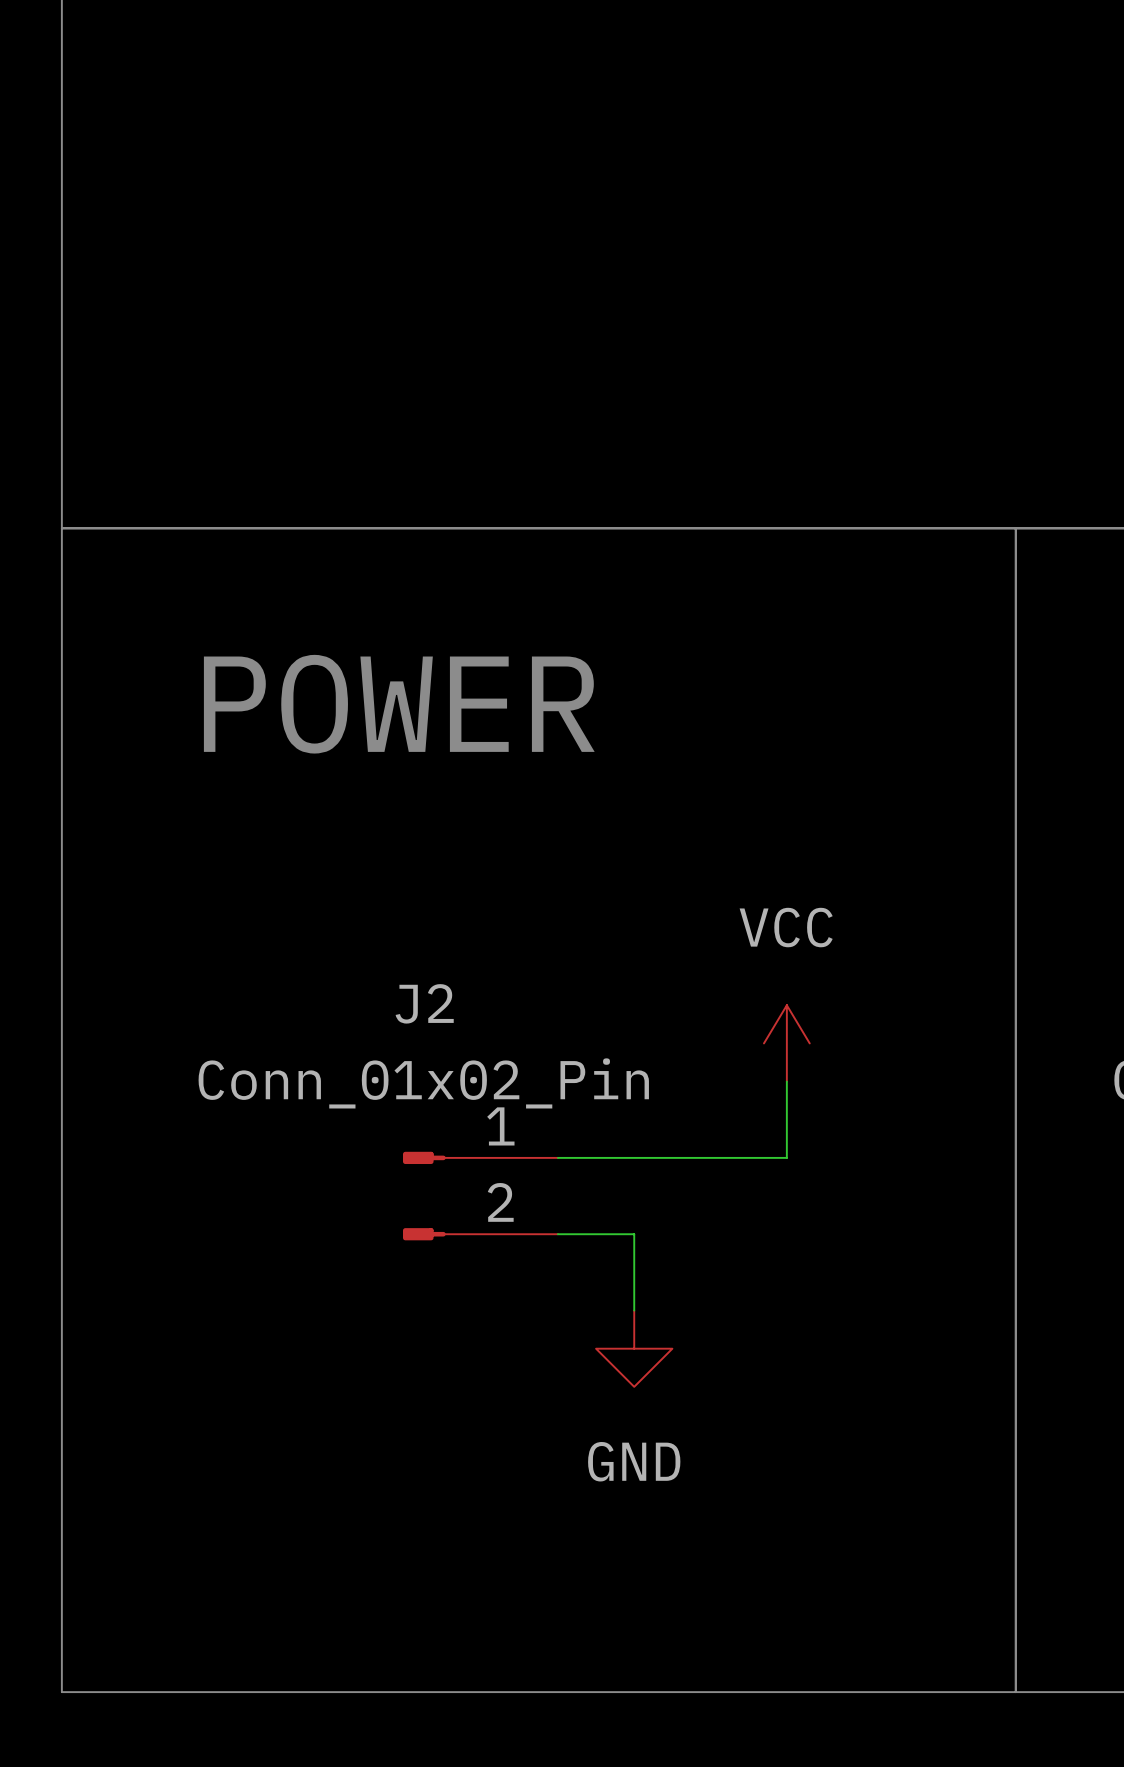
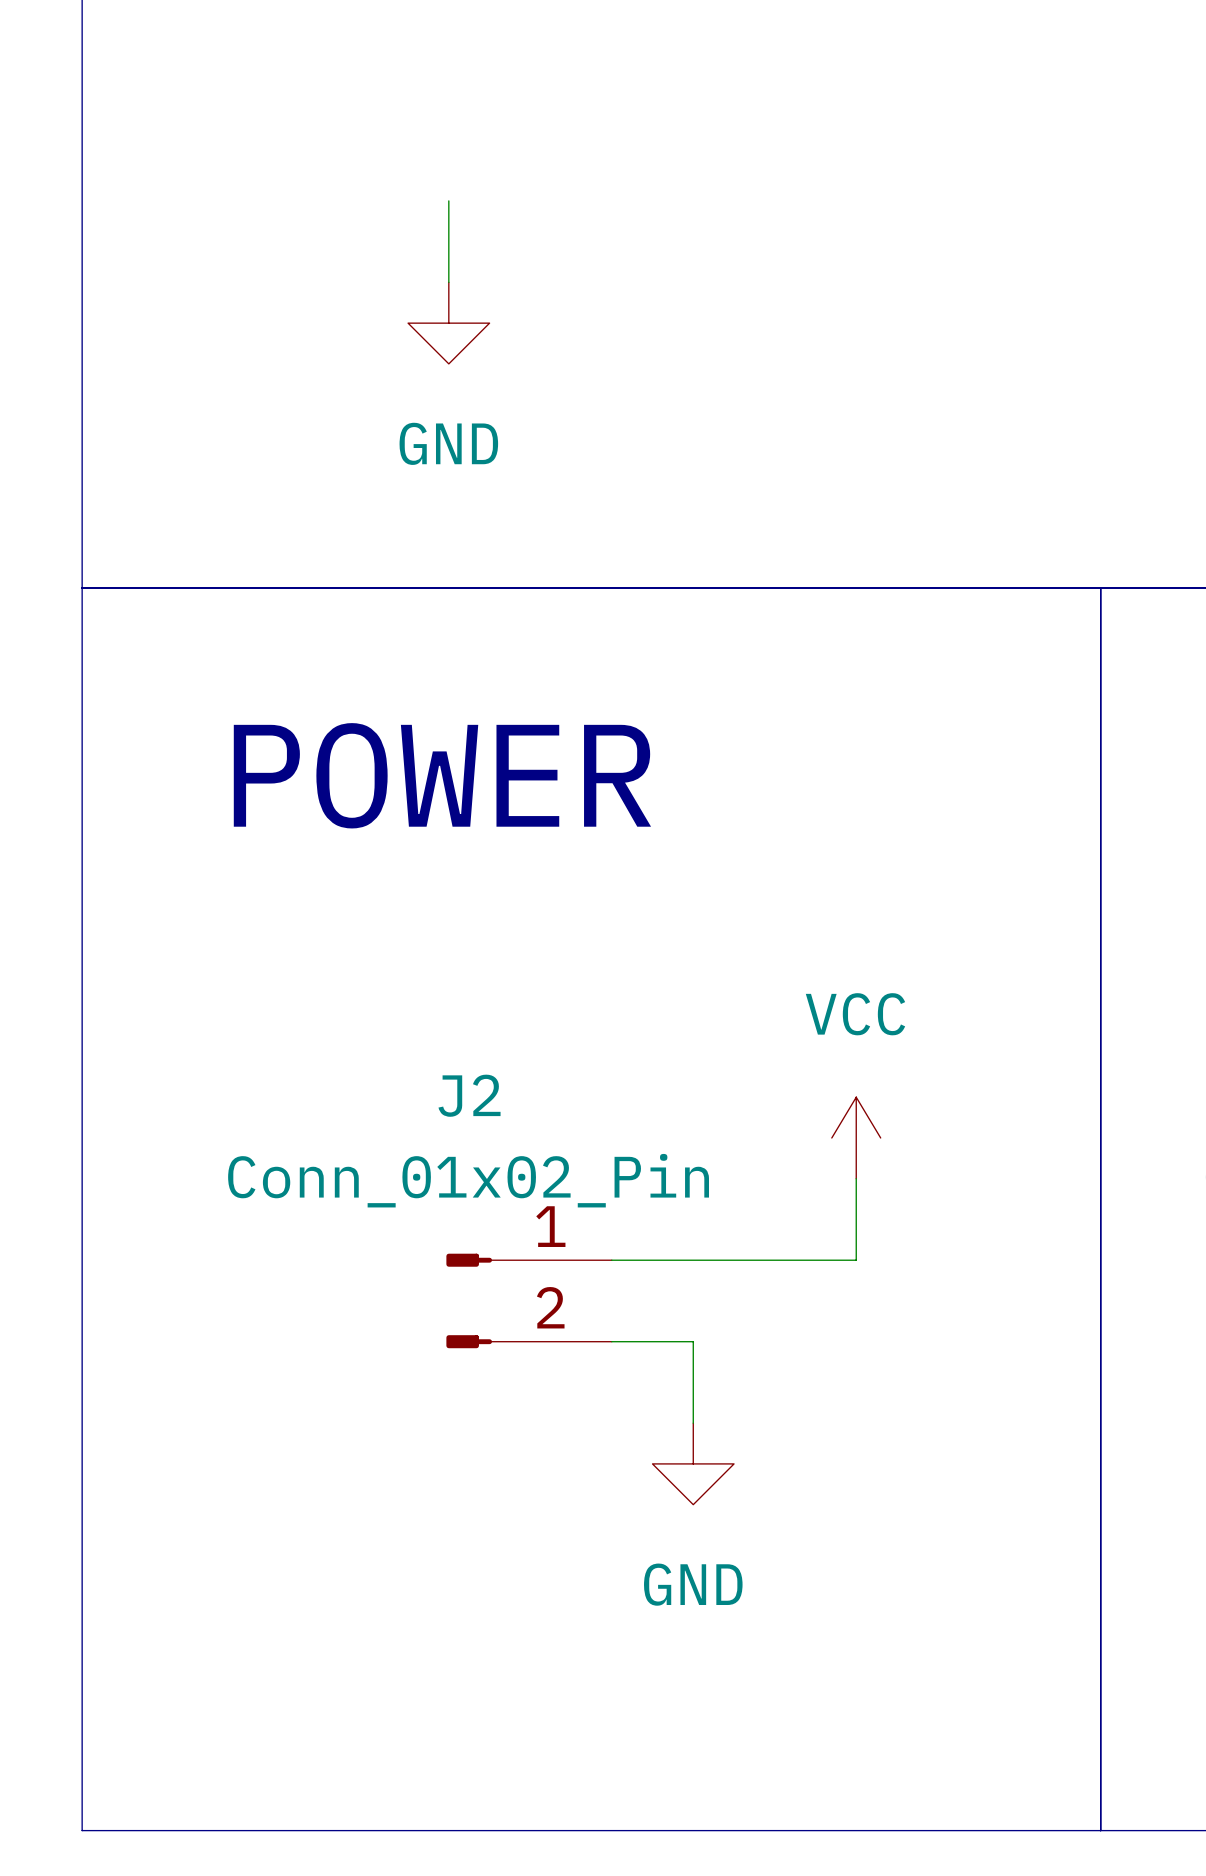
wire: none -> (448, 200) (448, 282)
power symbol: none -> GND (448, 323)

